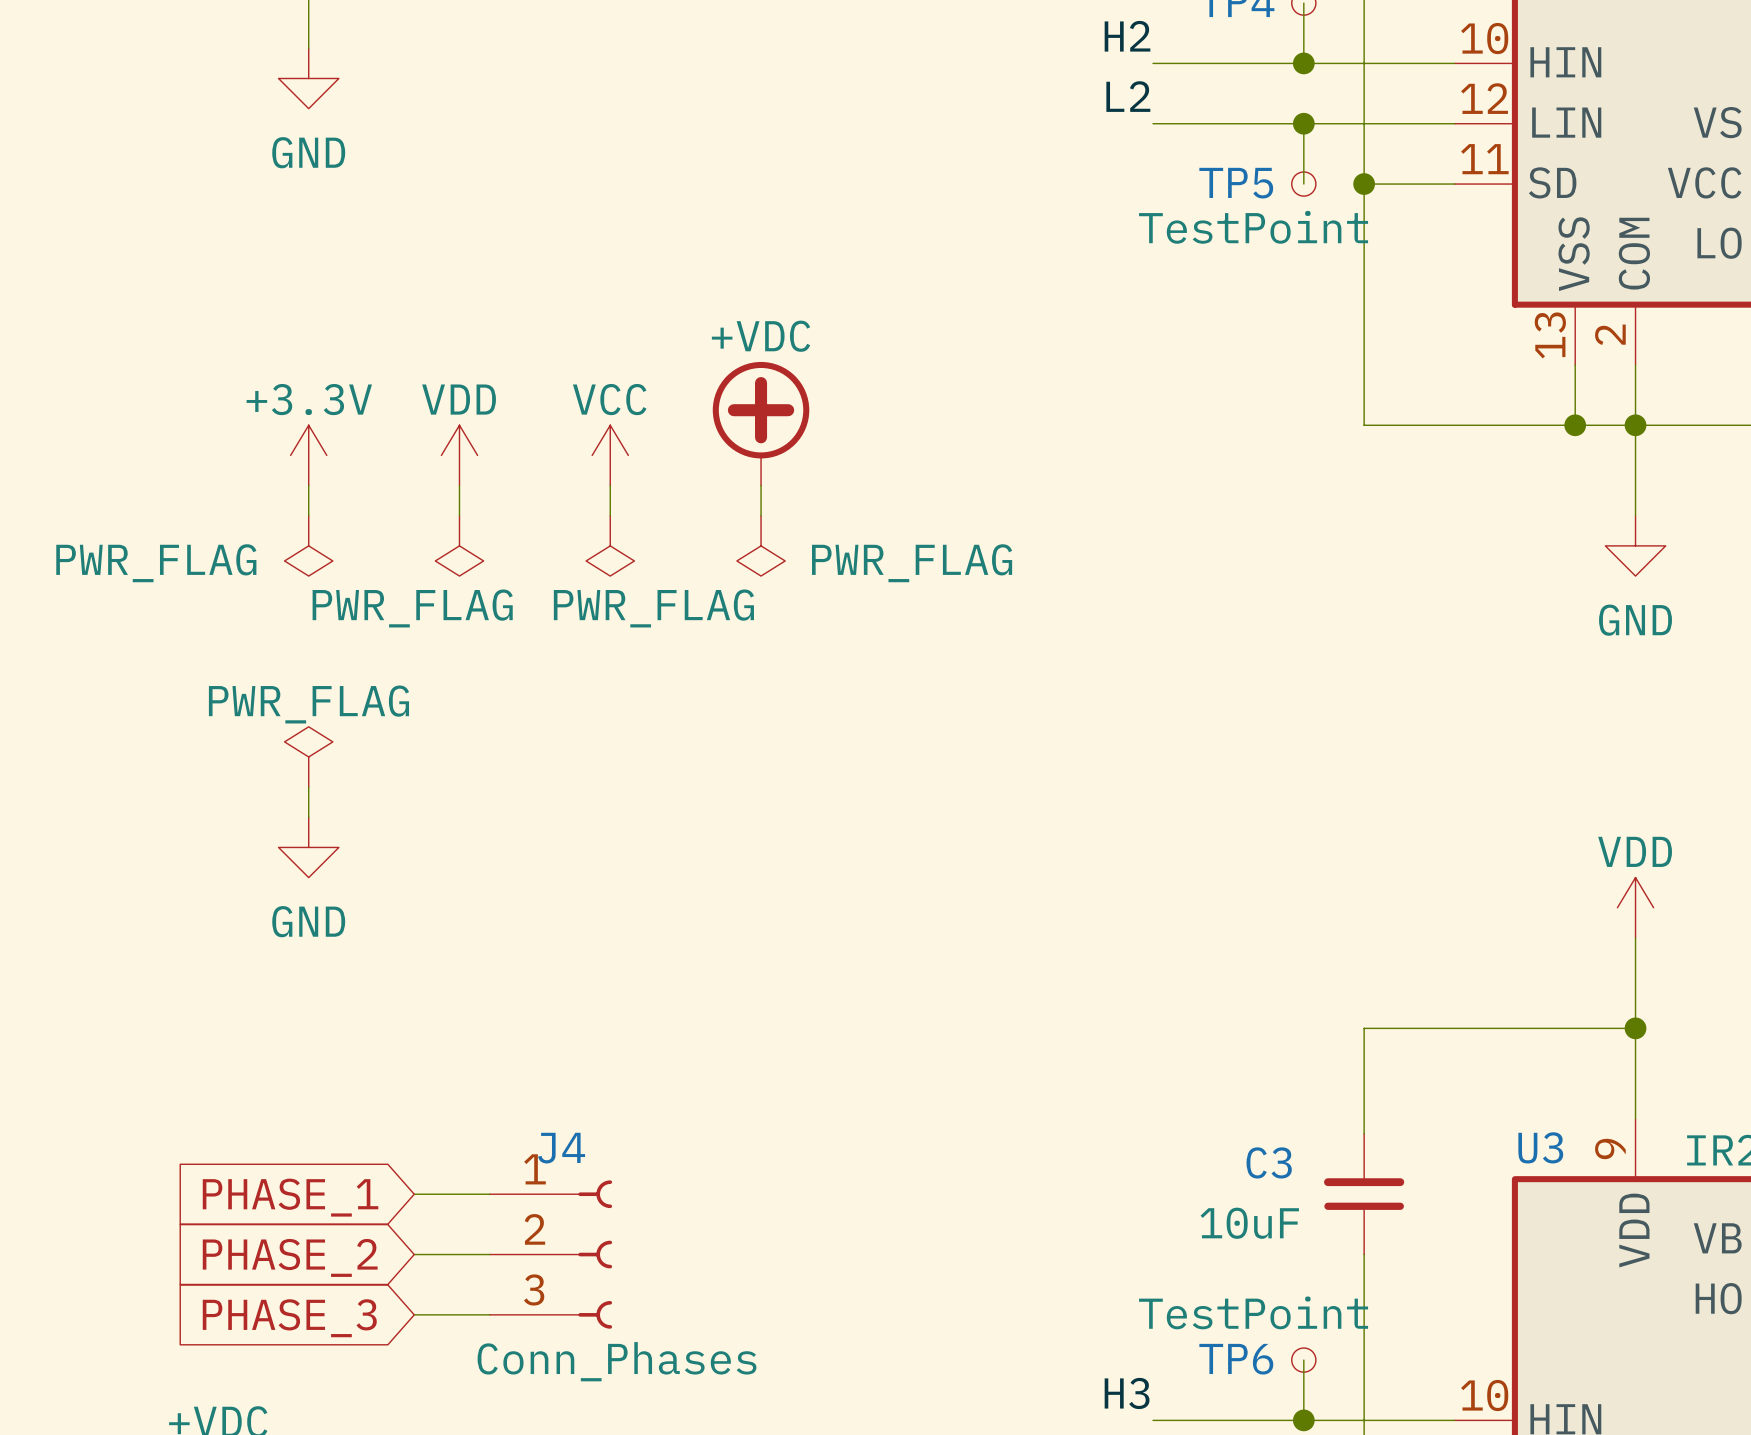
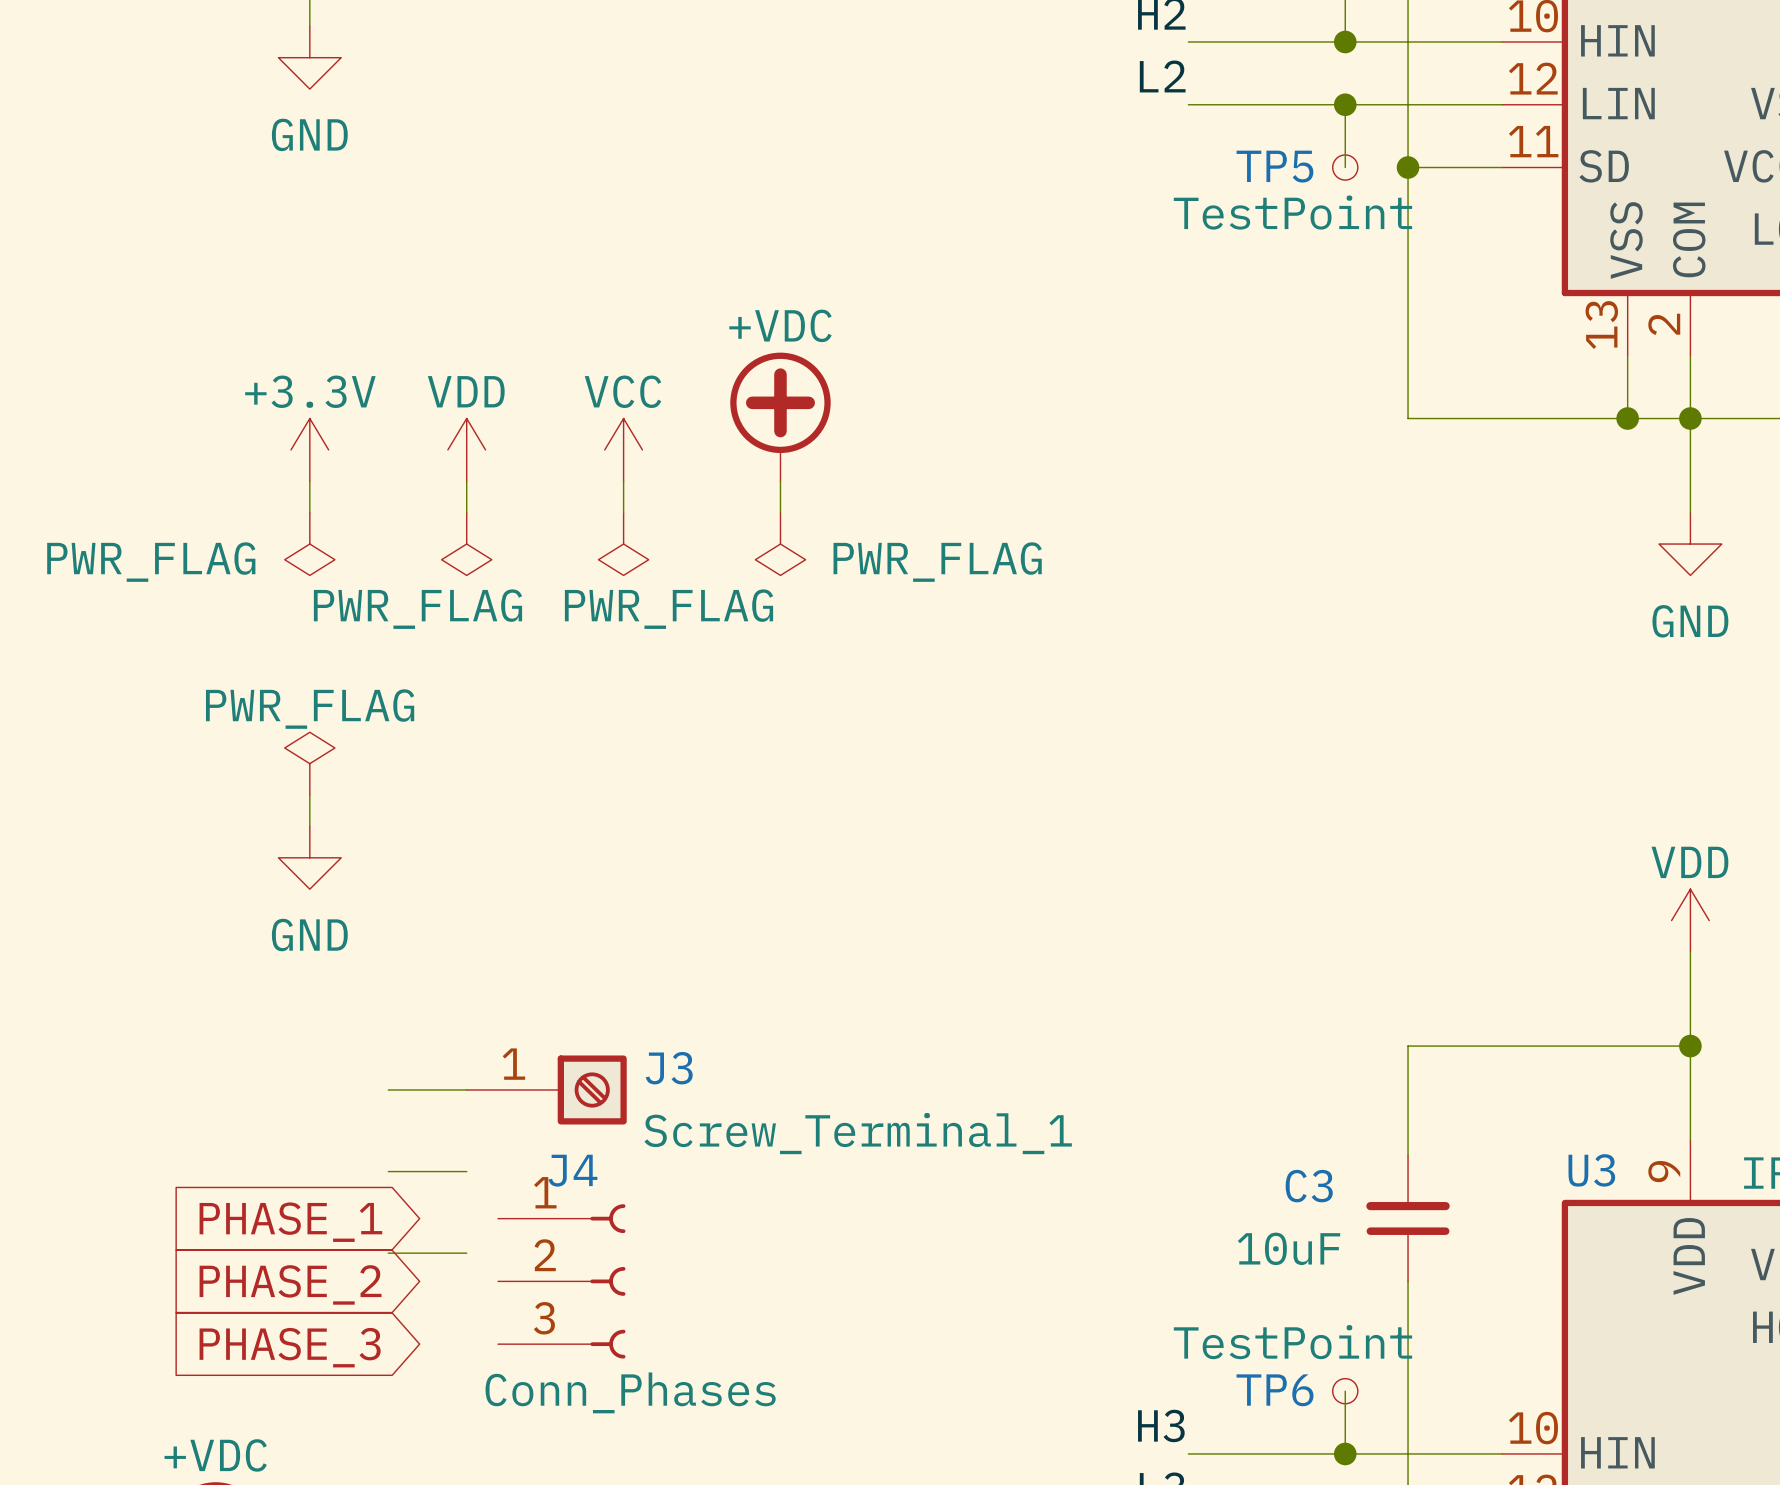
J3: none -> Screw_Terminal_1 (546, 1089)
wire: (414, 1194) (489, 1194) -> (388, 1171) (466, 1171)
wire: (414, 1254) (489, 1254) -> (388, 1253) (466, 1253)
wire: (414, 1314) (489, 1314) -> (388, 1089) (466, 1089)

